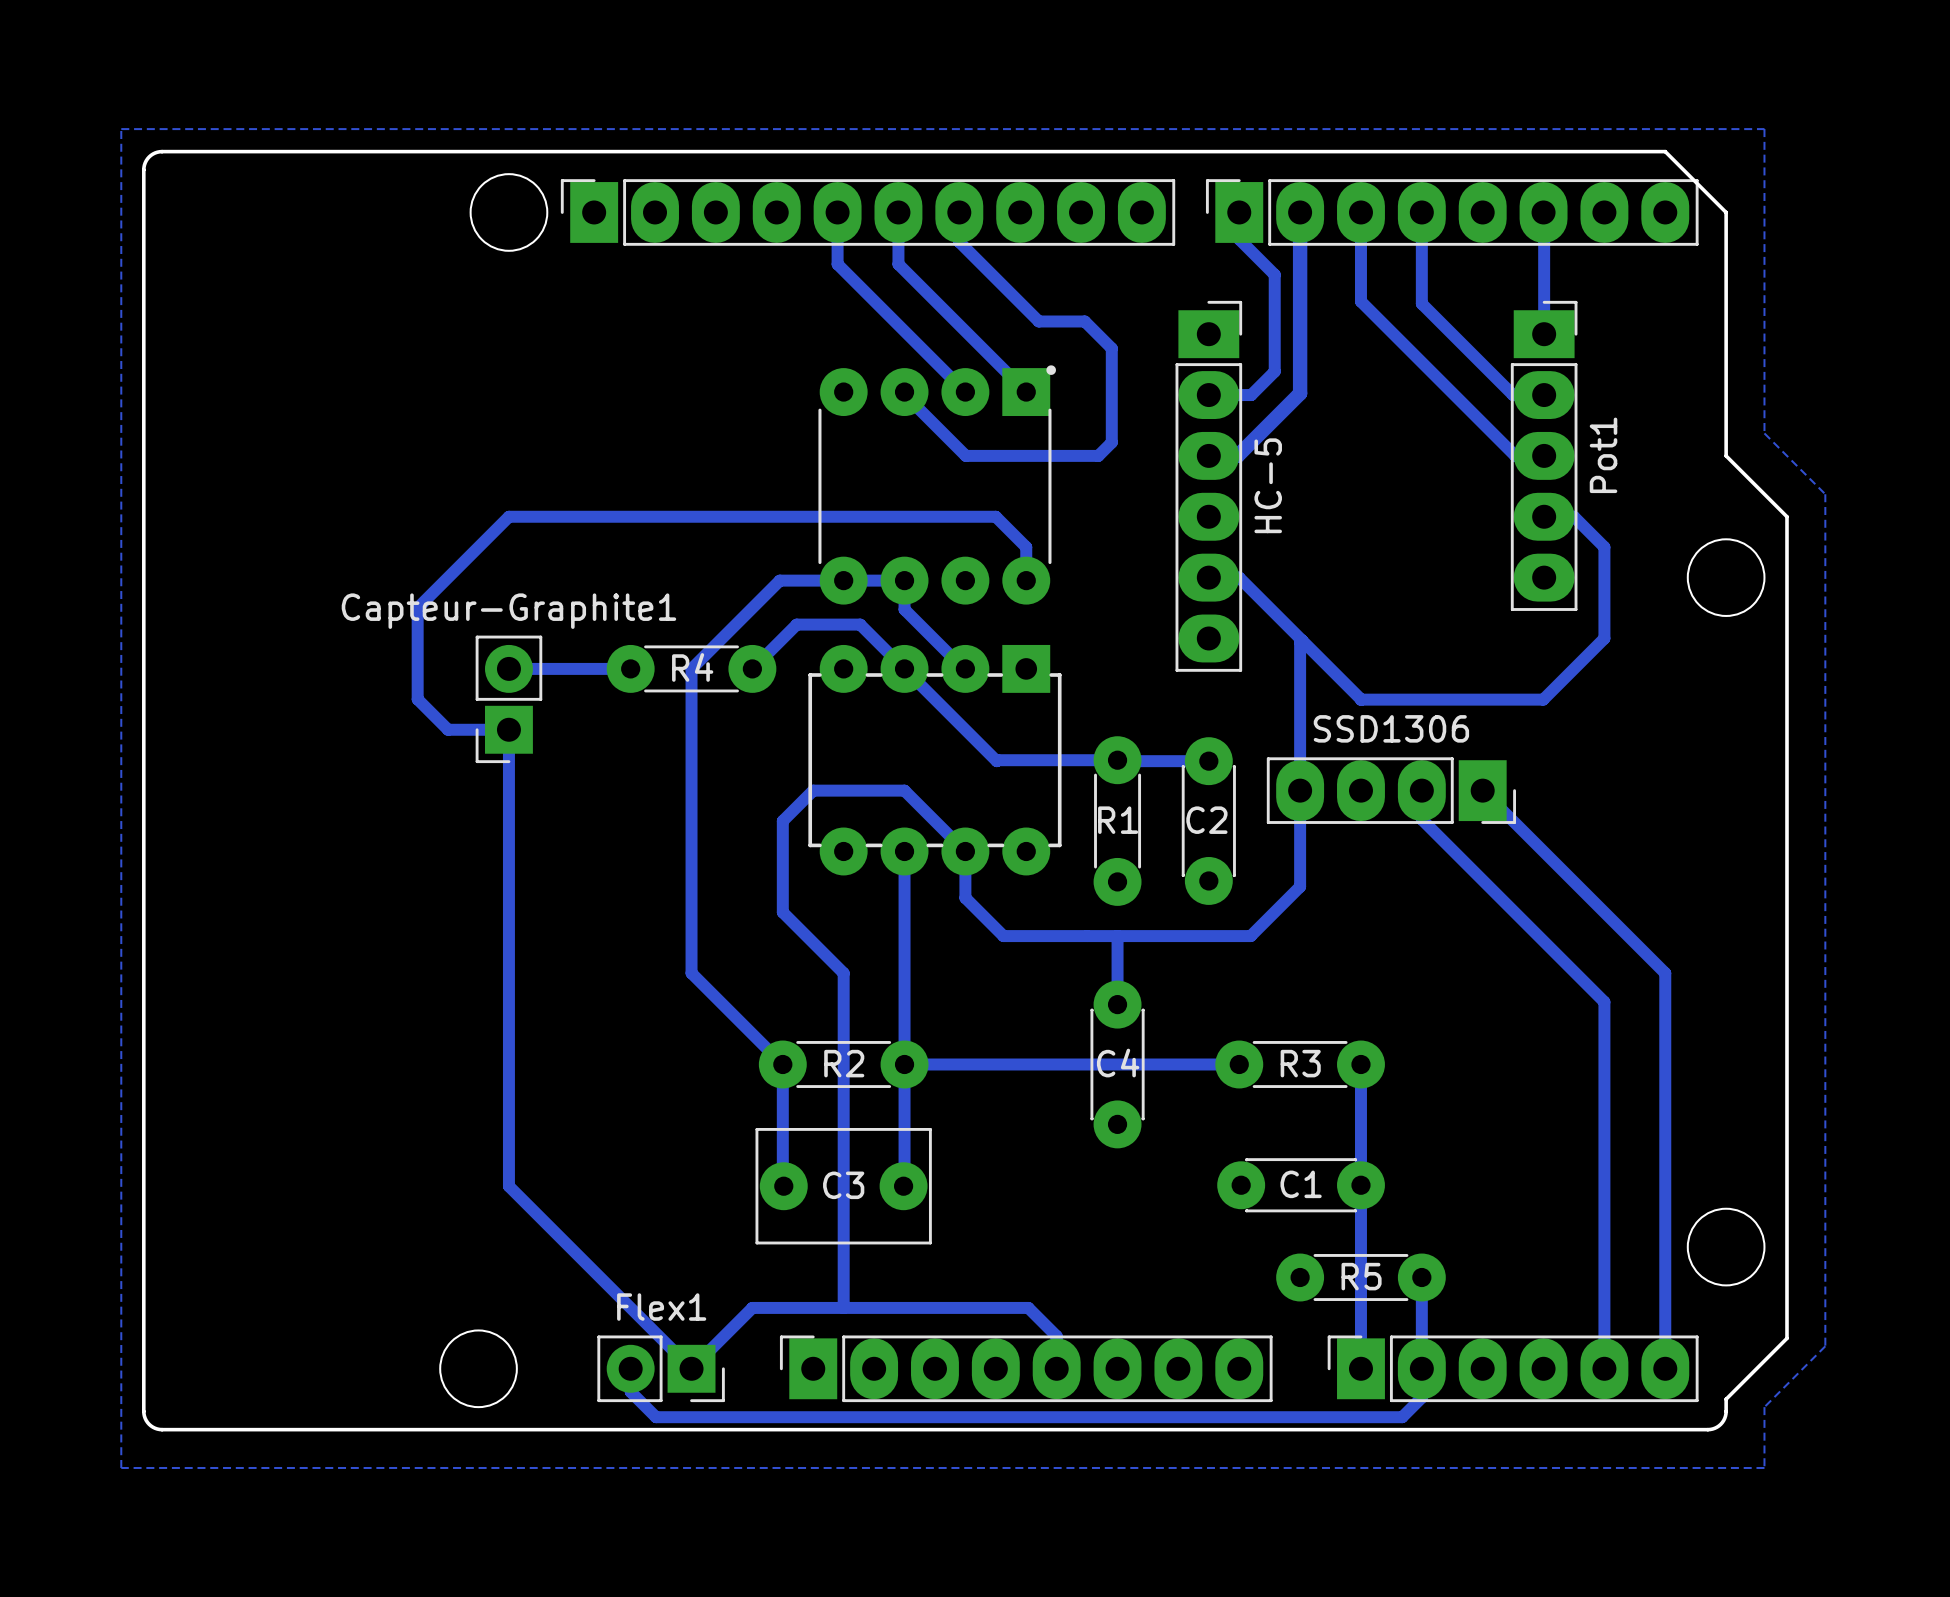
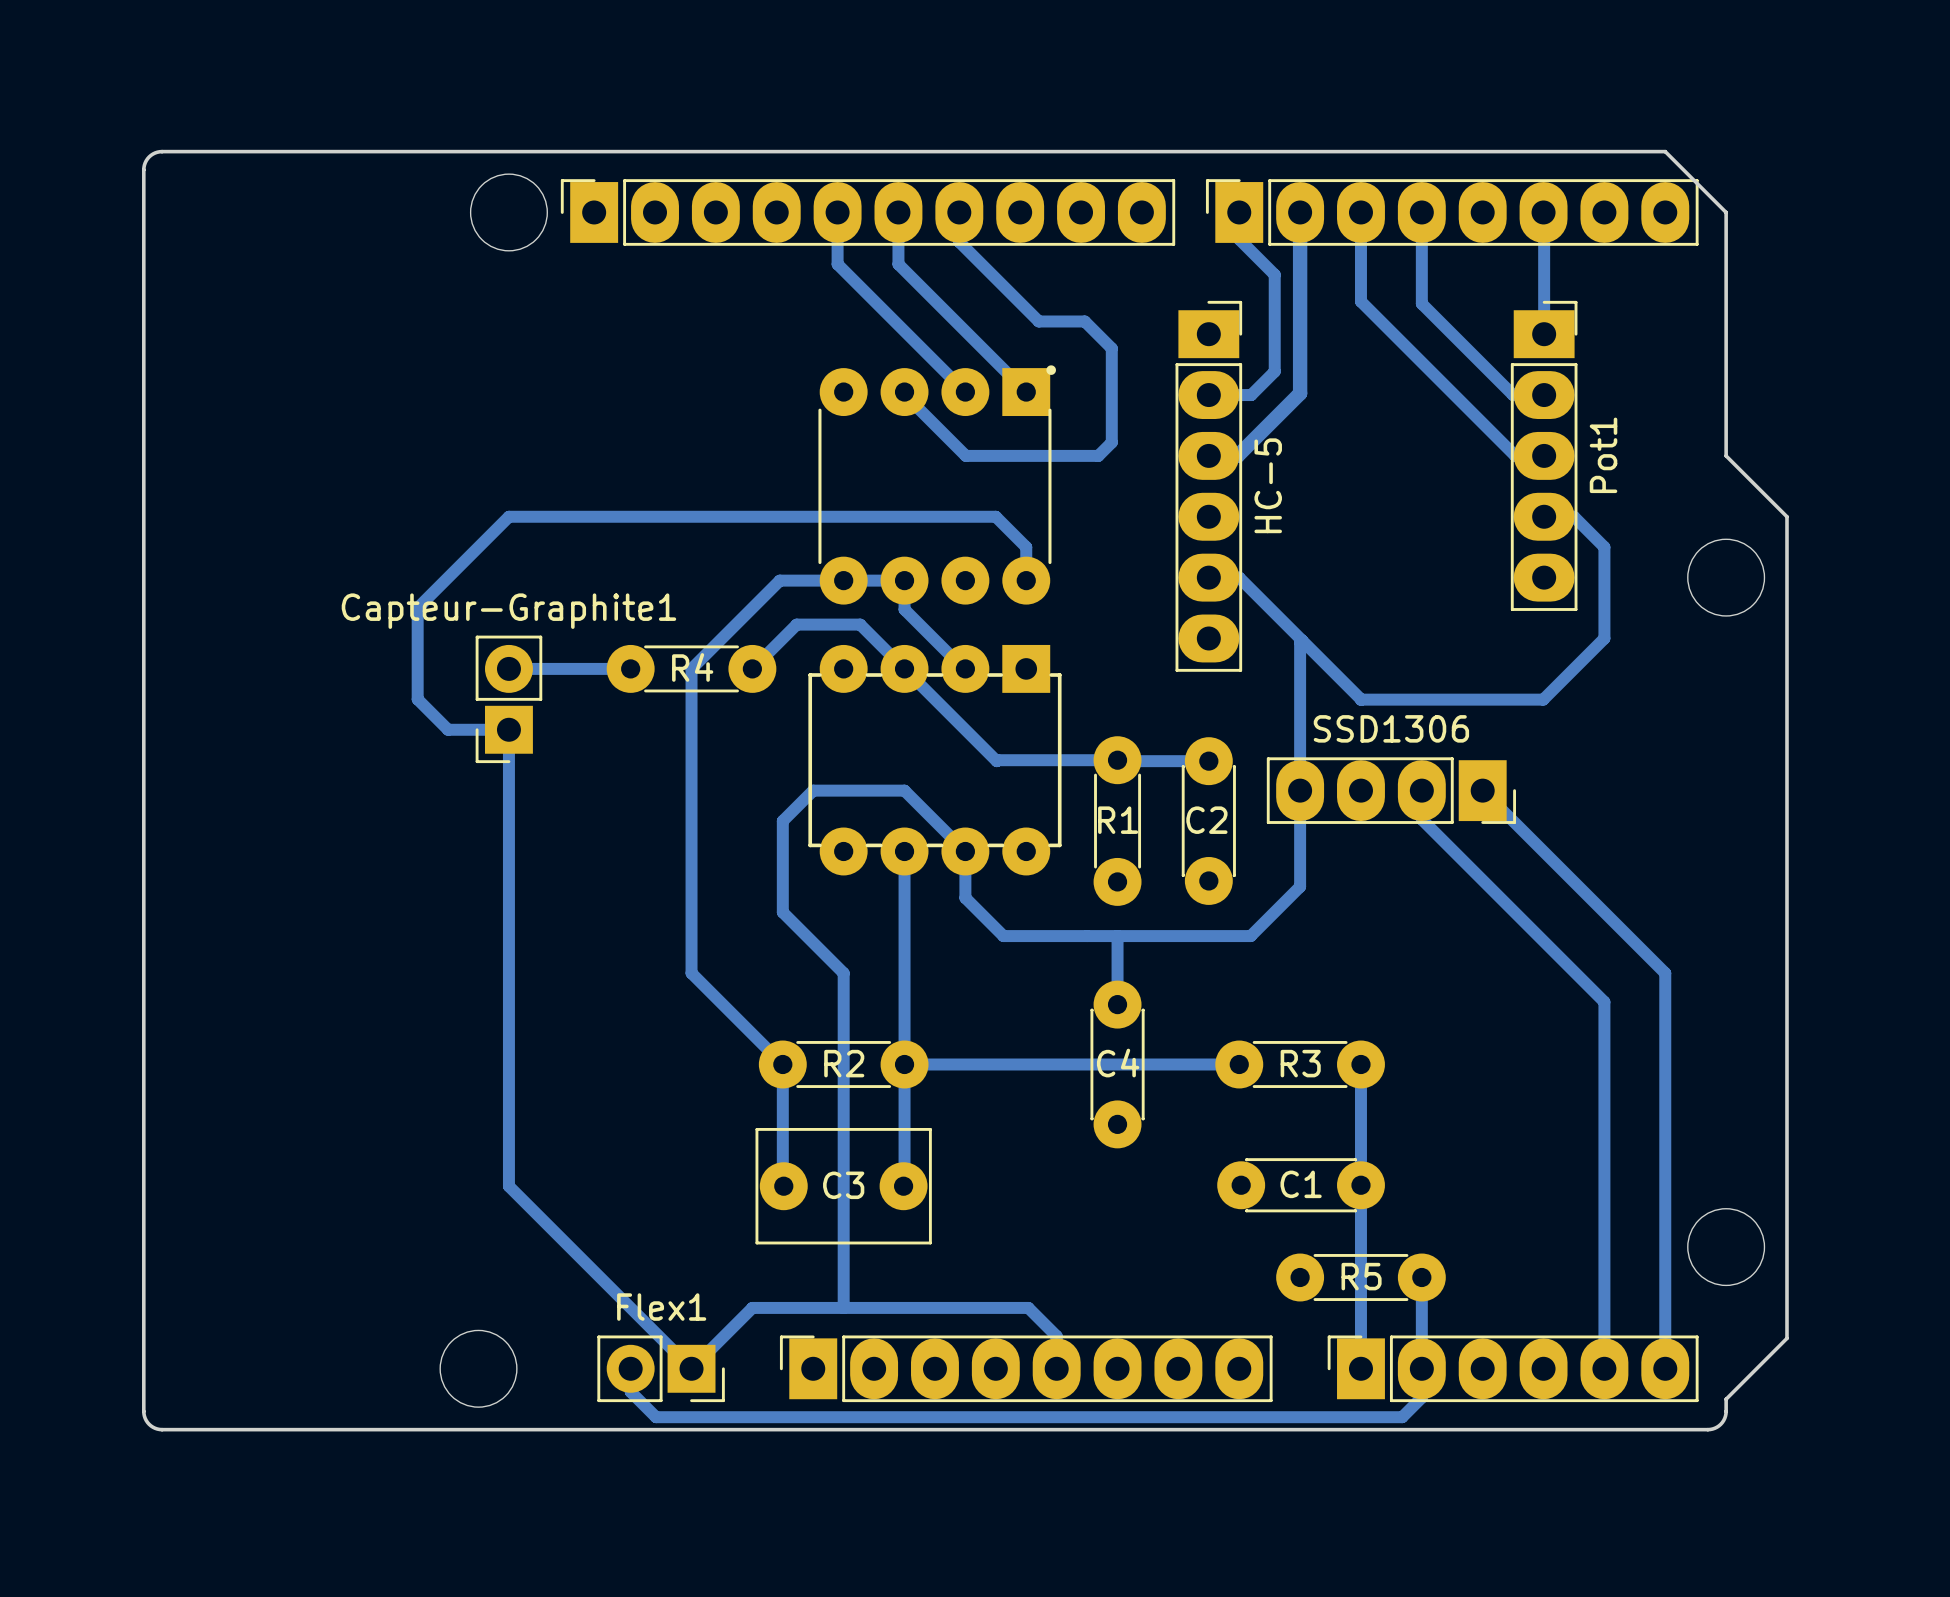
bottom zone outline: (121, 129) (121, 1467) (1764, 1467) (1764, 1407) (1825, 1346) (1825, 494) (1764, 433) (1764, 129) (121, 129) -> none

